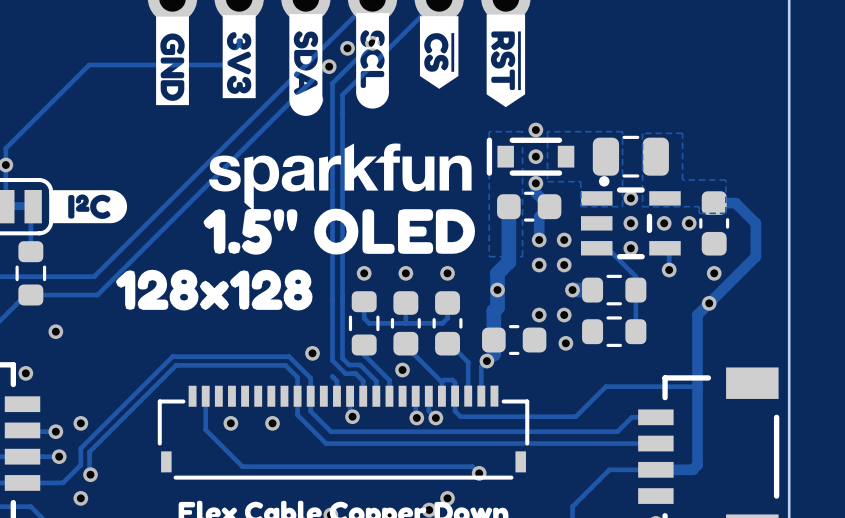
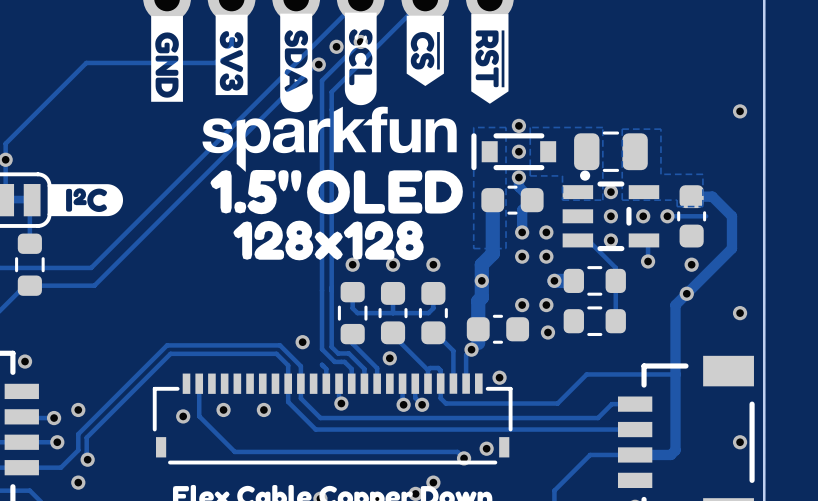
via: none -> (740, 111)
drawing: none -> [210, 169, 463, 215]
drawing position: (340, 177) -> (329, 139)
drawing: [203, 208, 476, 255] -> none
track: none -> (667, 216) (706, 216)
drawing position: (214, 290) -> (328, 240)
via: none -> (740, 313)
via: (55, 331) -> none
via: none -> (499, 377)
via: none -> (183, 416)
via: none -> (740, 442)
via: none -> (486, 448)

